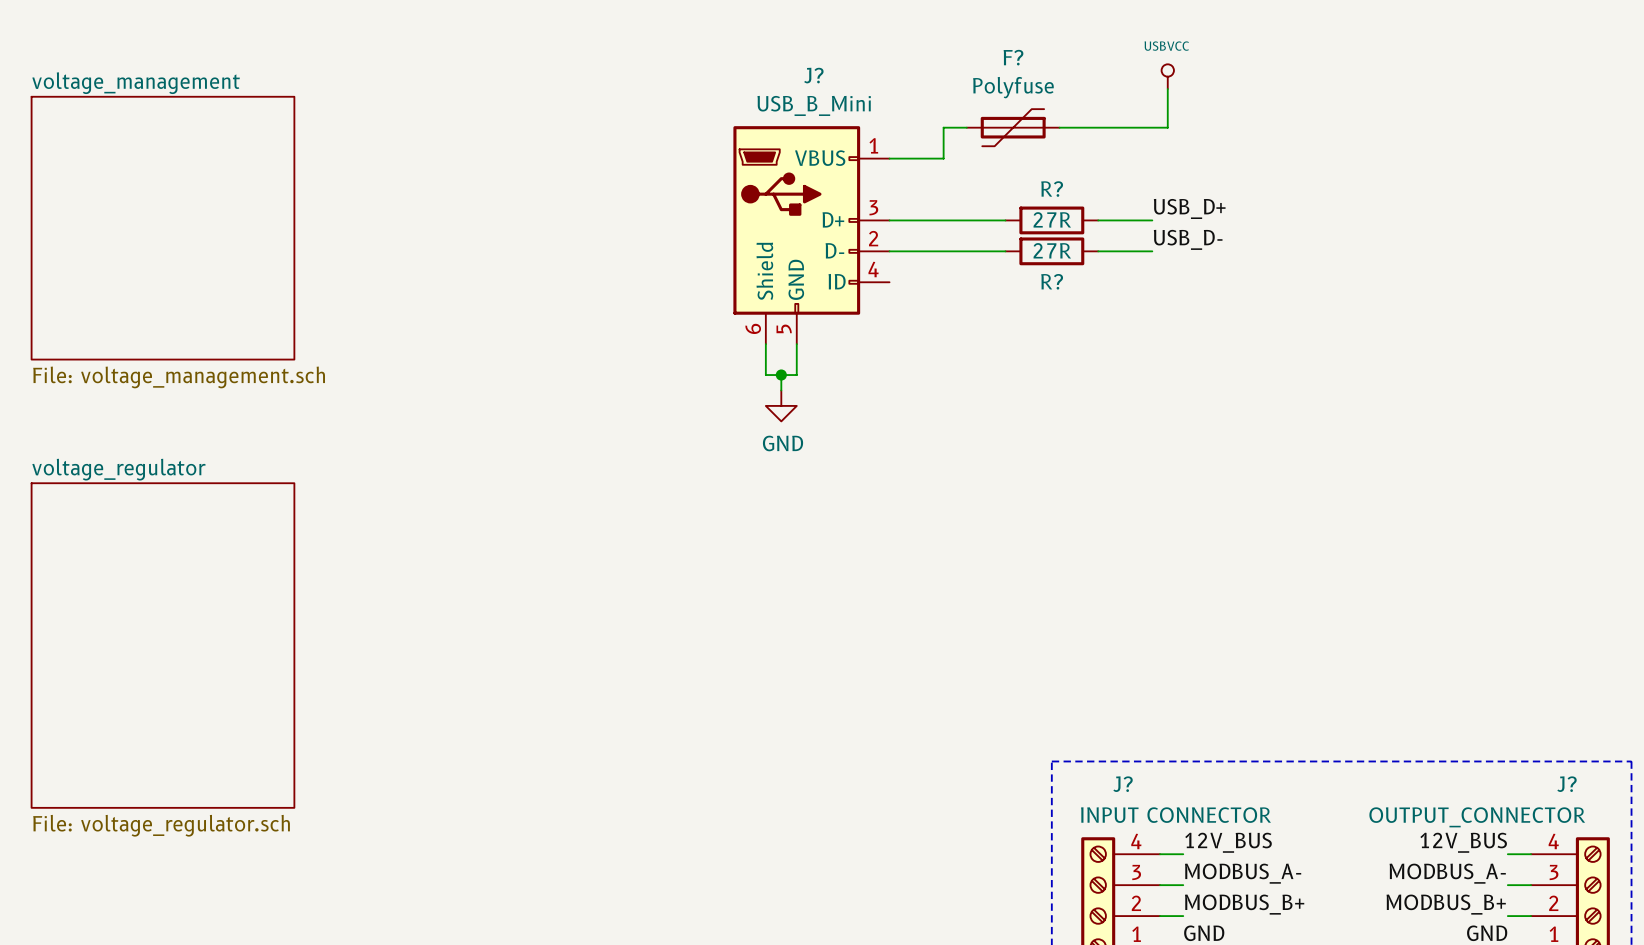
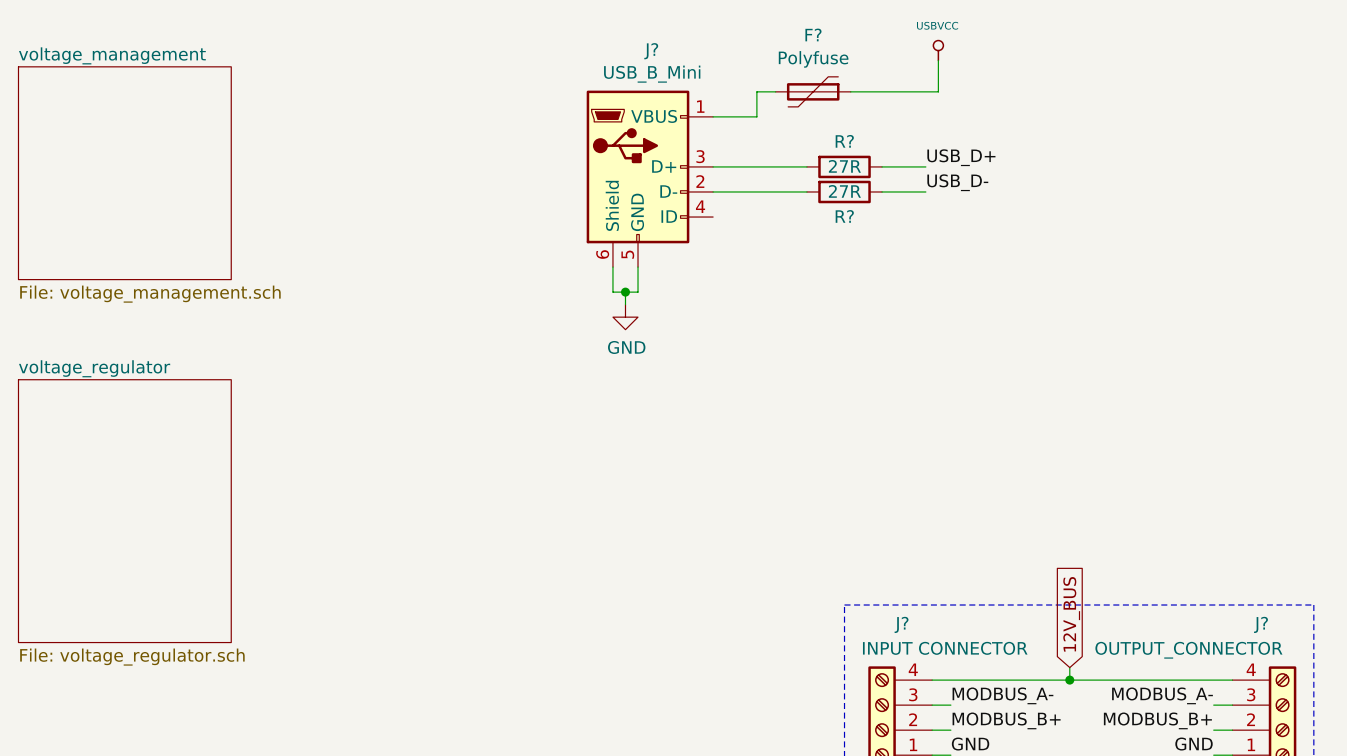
global label: none -> 12V_BUS (1071, 614)
wire: none -> (1069, 667) (1069, 680)
label: 12V_BUS (1228, 842) -> none
label: 12V_BUS (1463, 842) -> none
wire: none -> (950, 680) (1213, 680)
junction: none -> (1069, 680)

